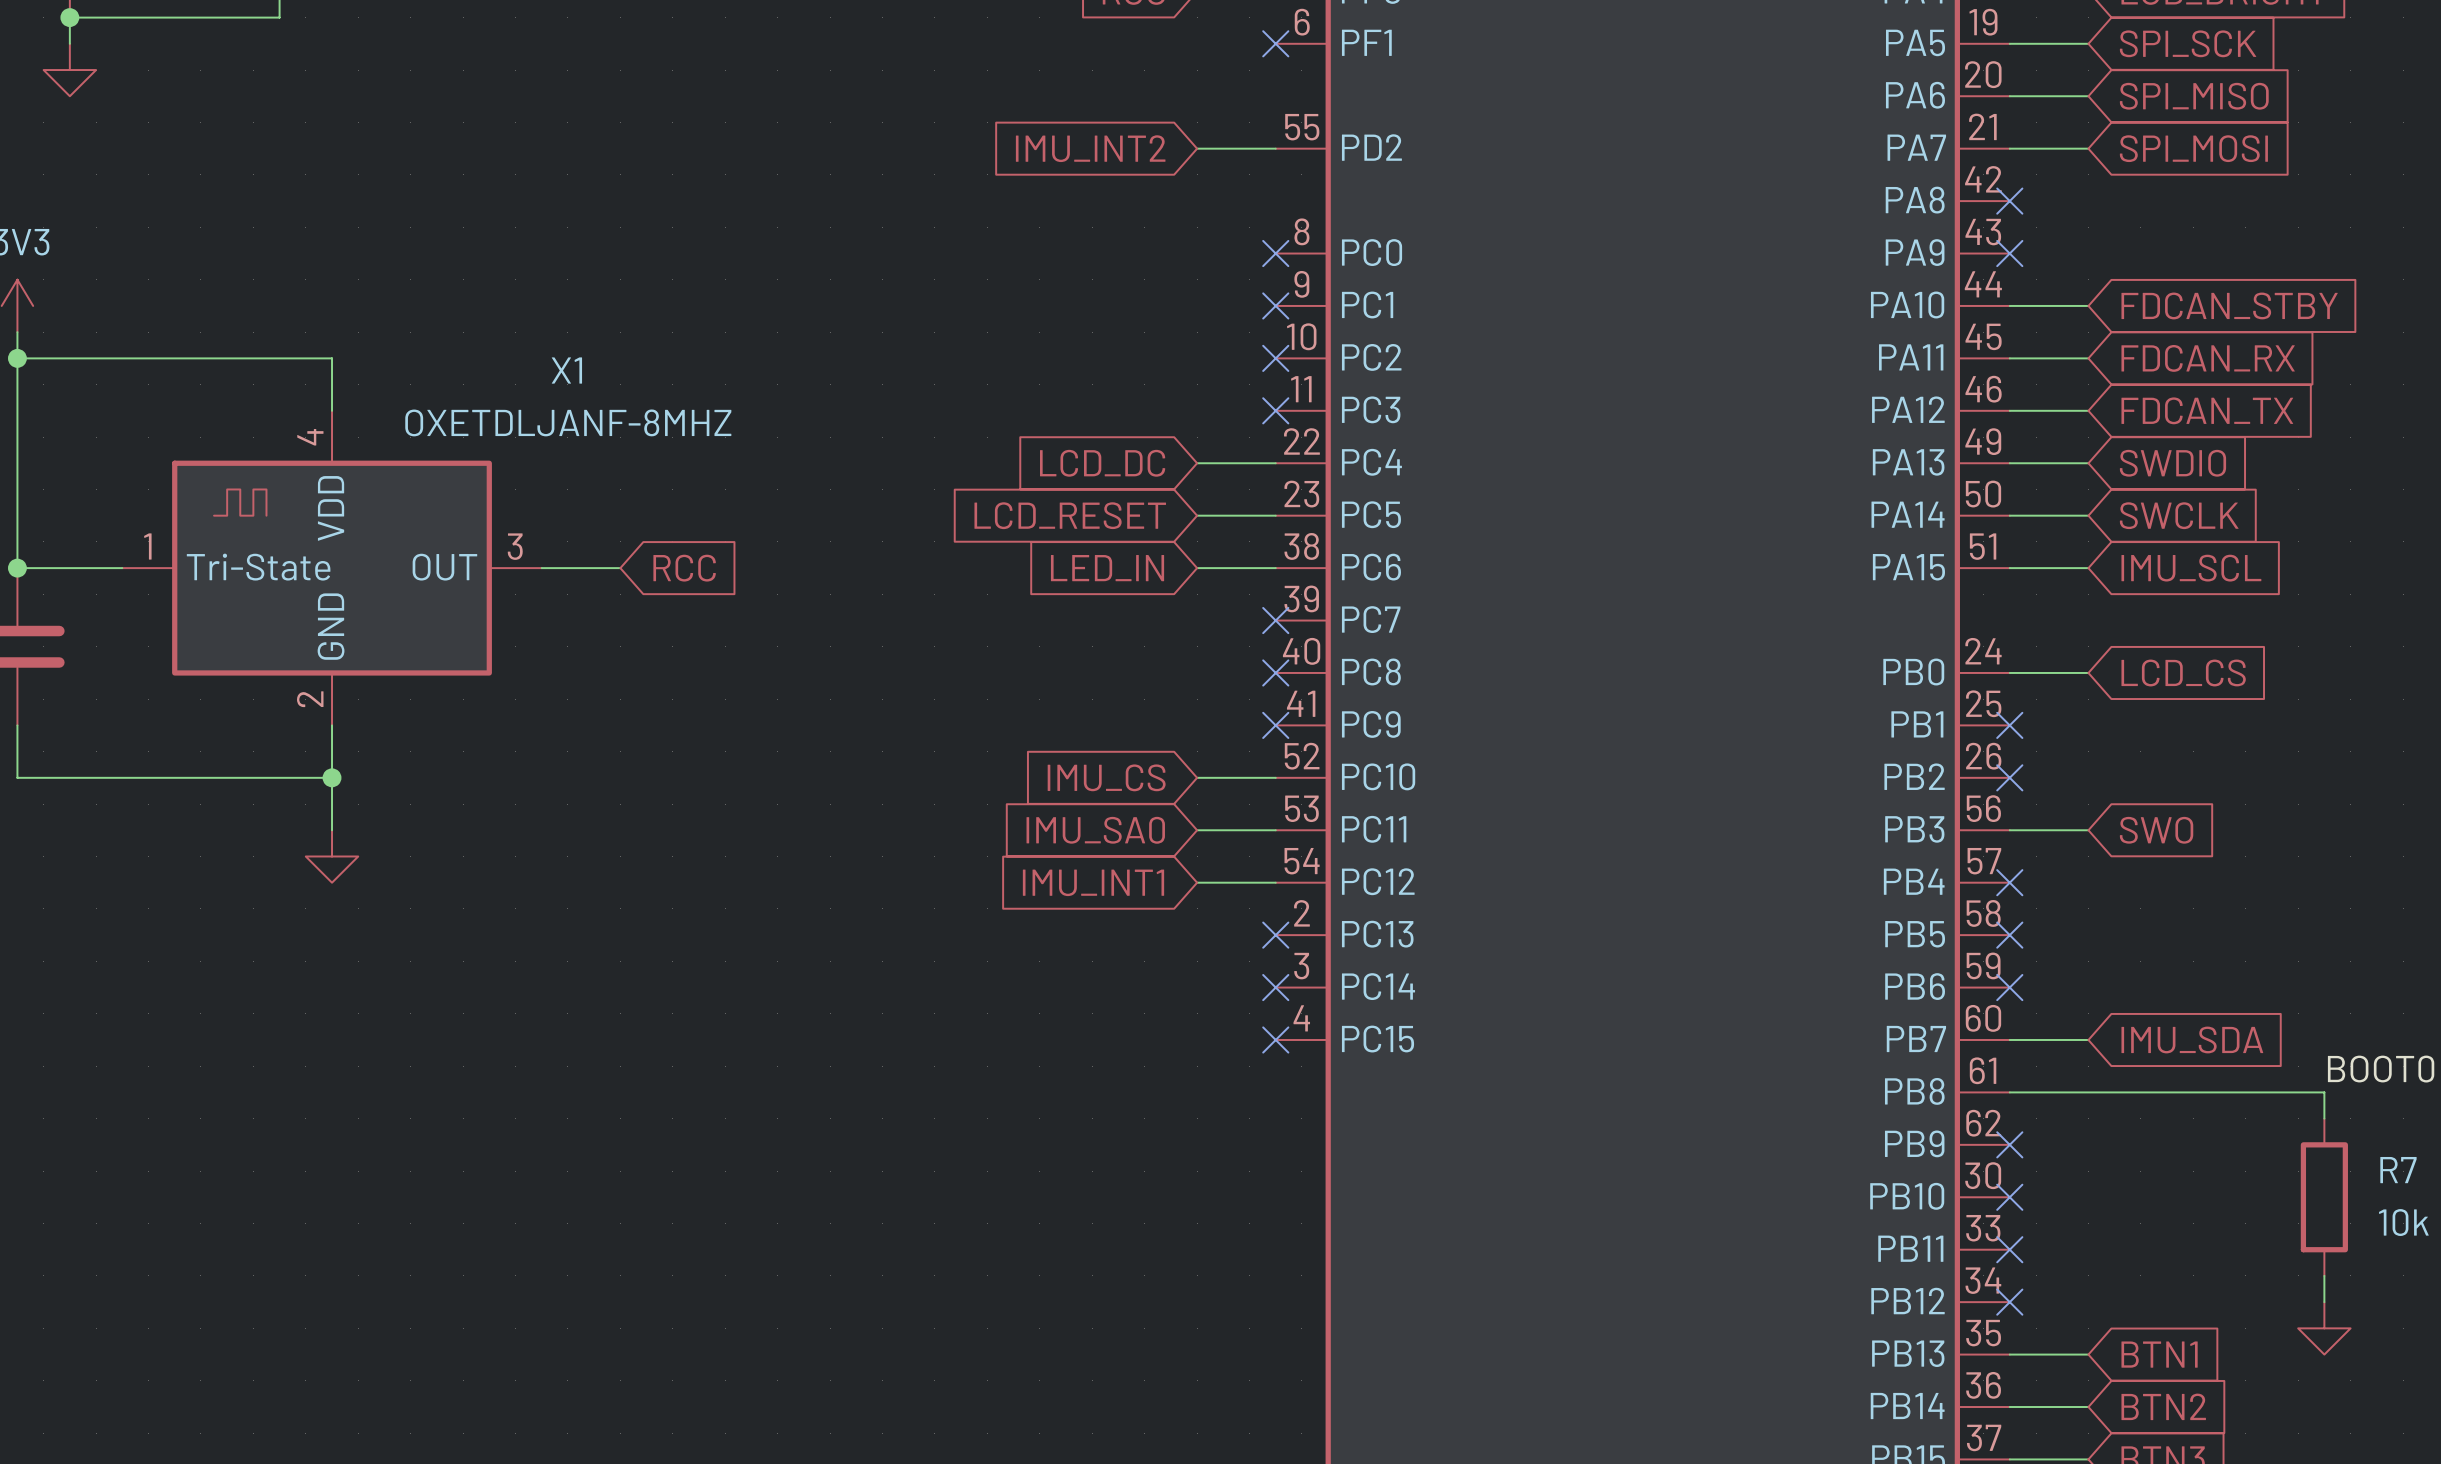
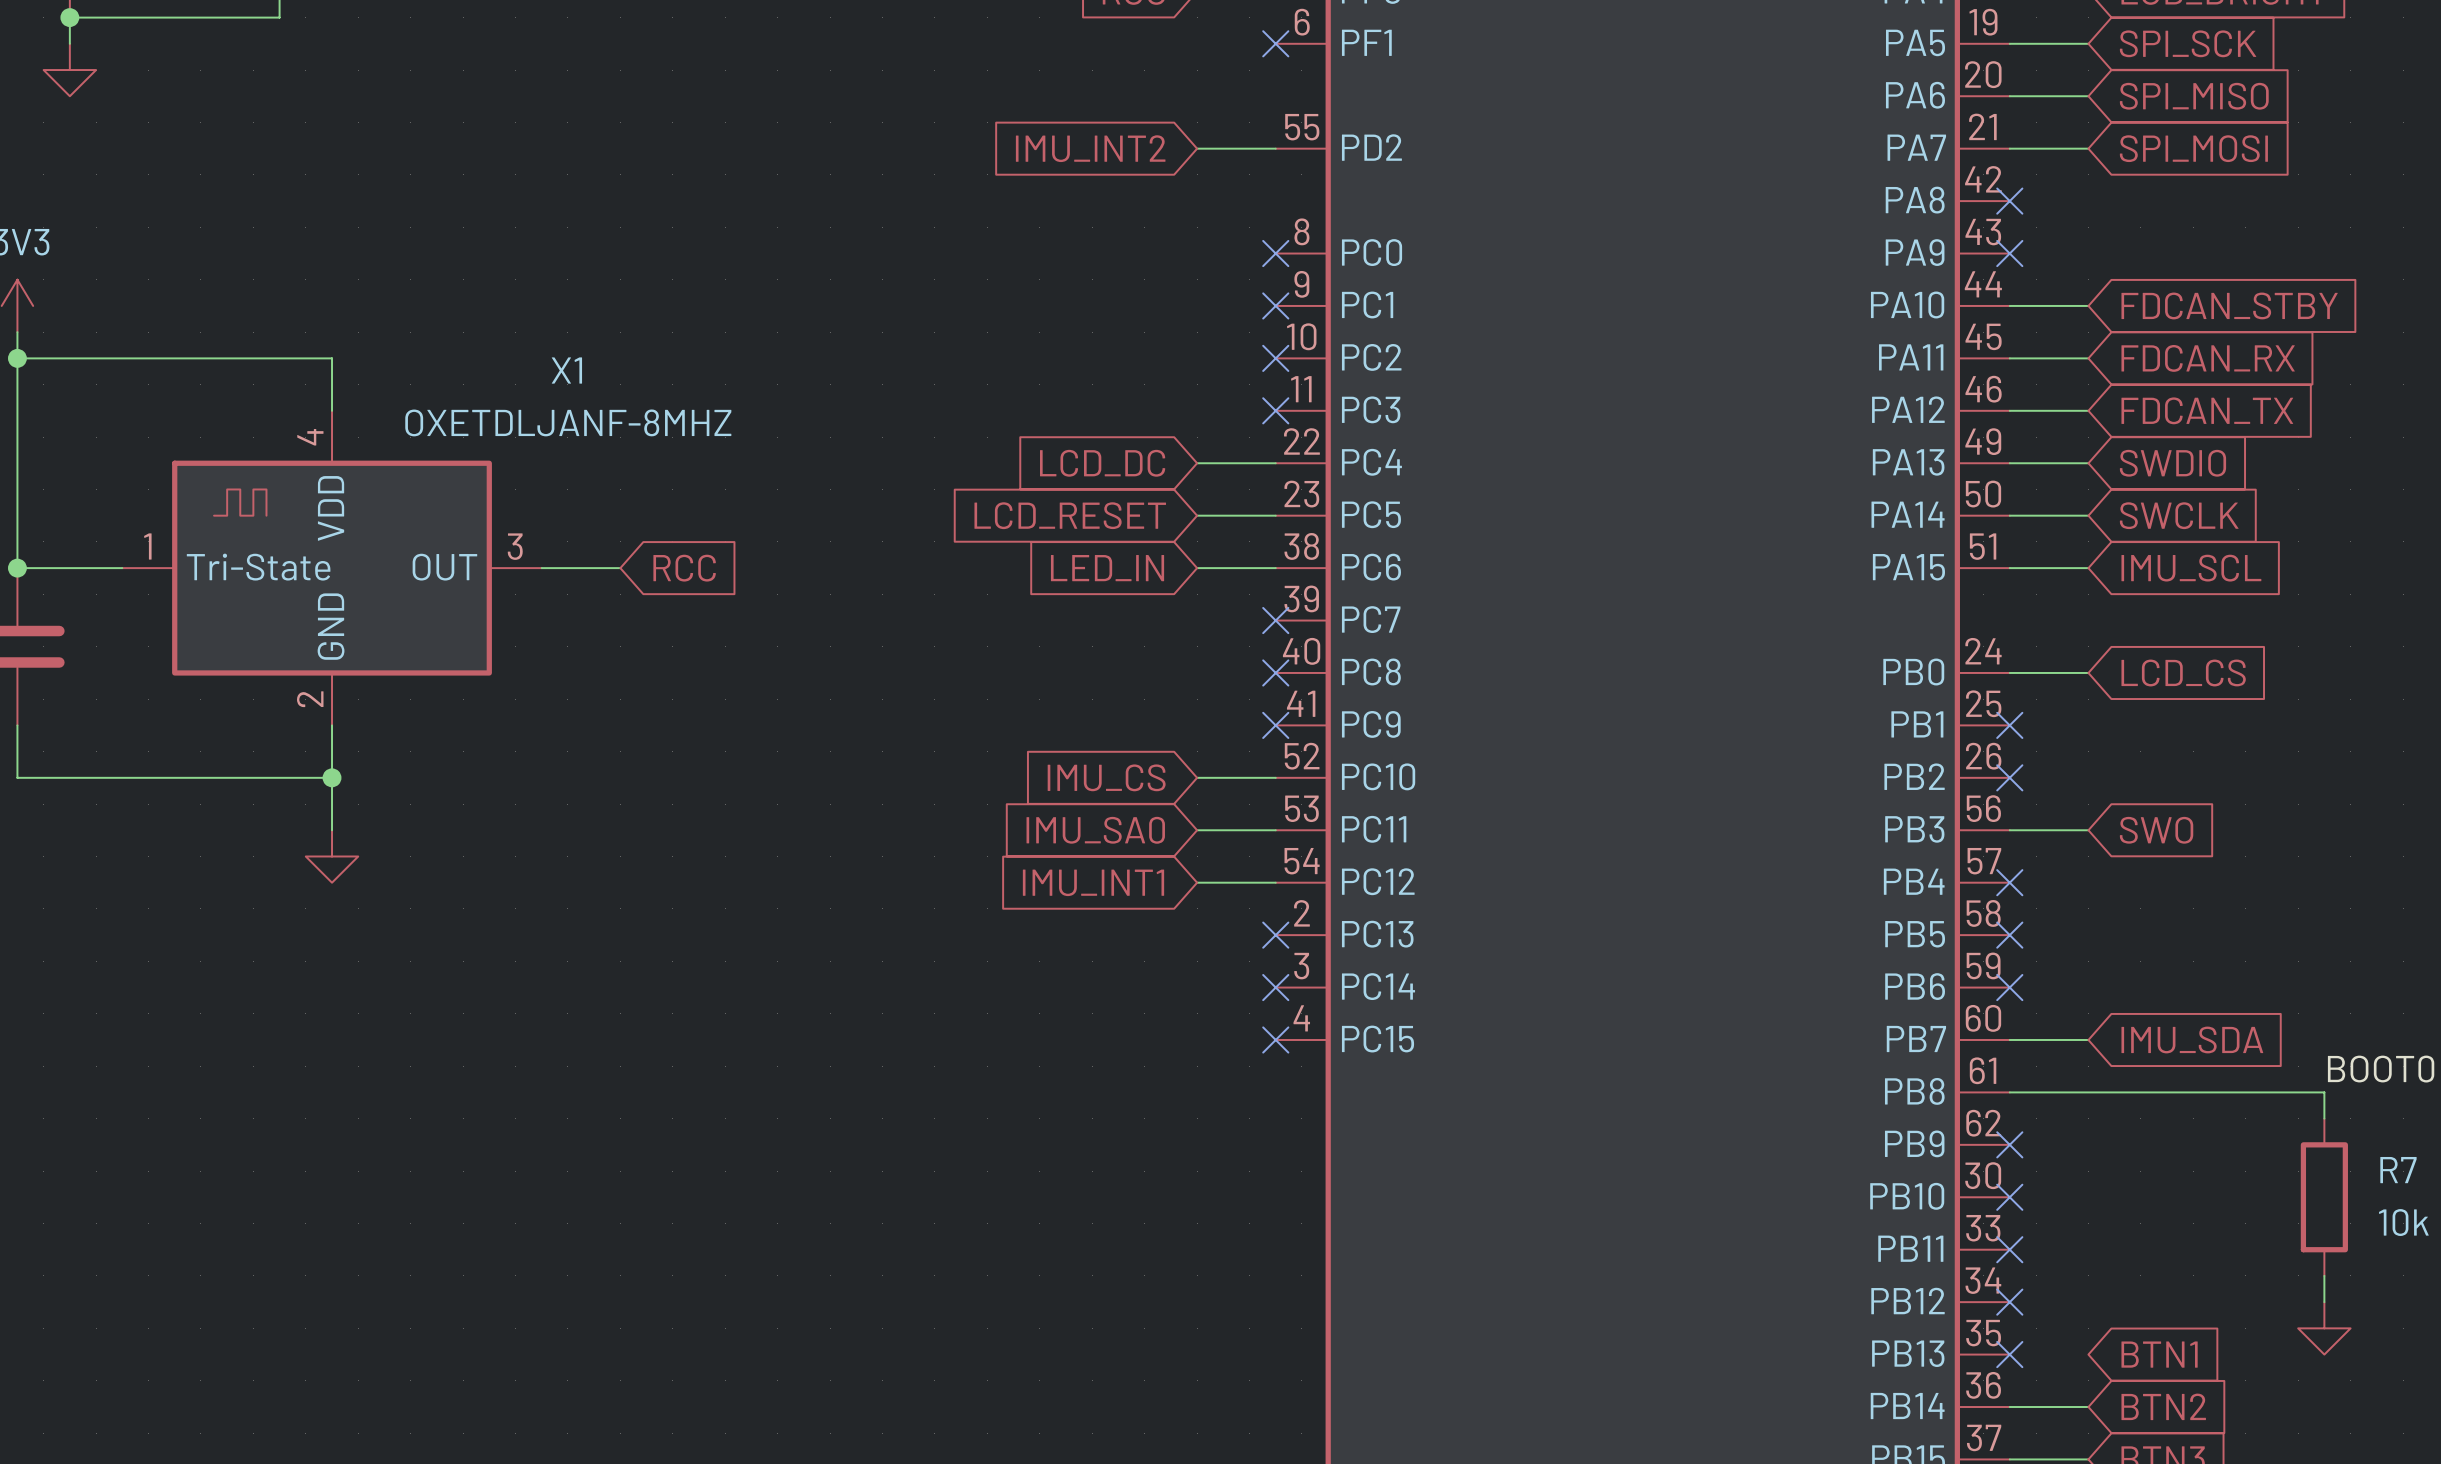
wire: (2009, 1354) (2088, 1354) -> none
no-connect mark: none -> (2009, 1354)

